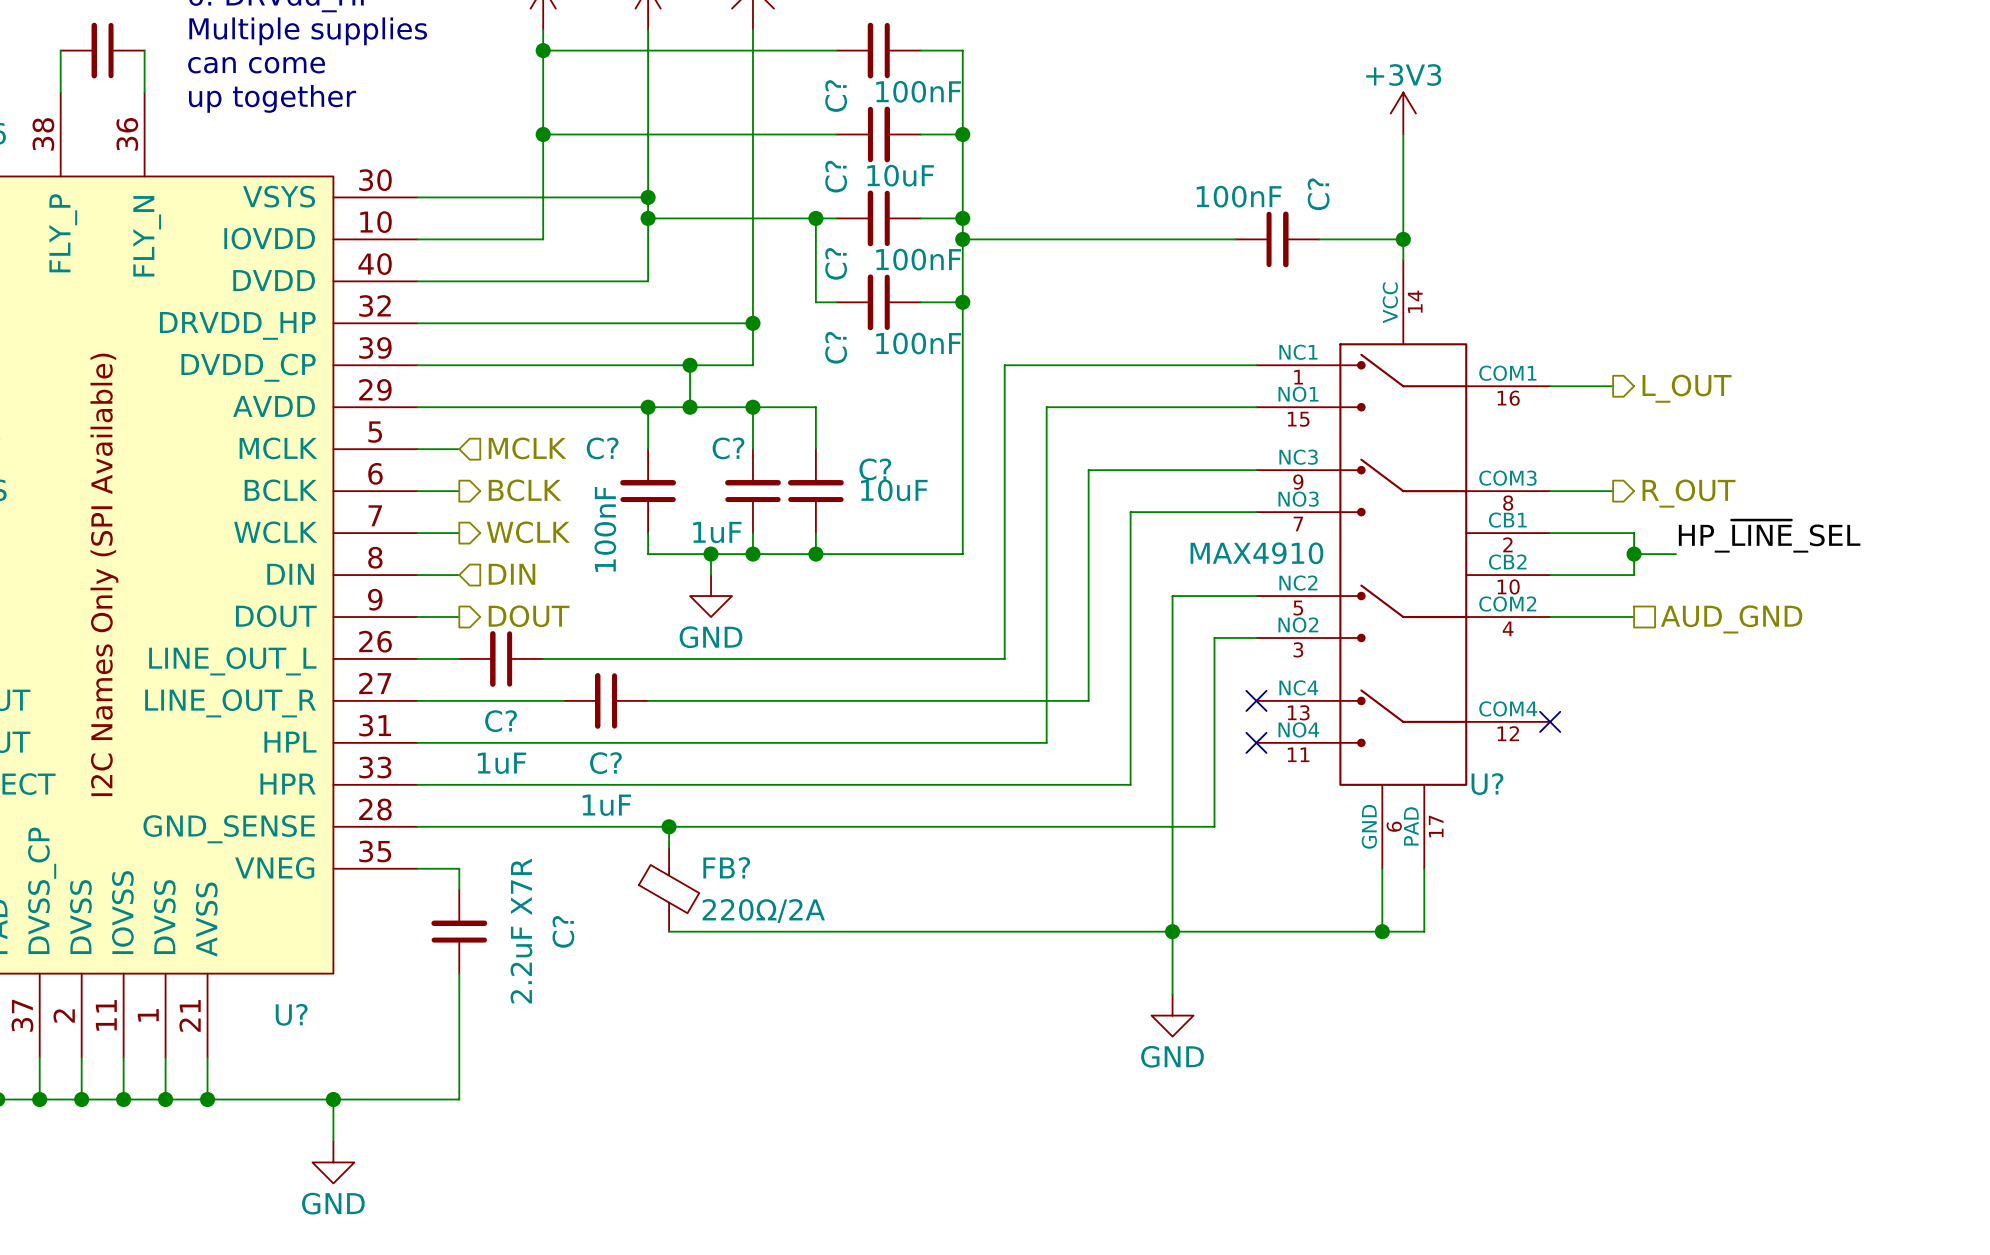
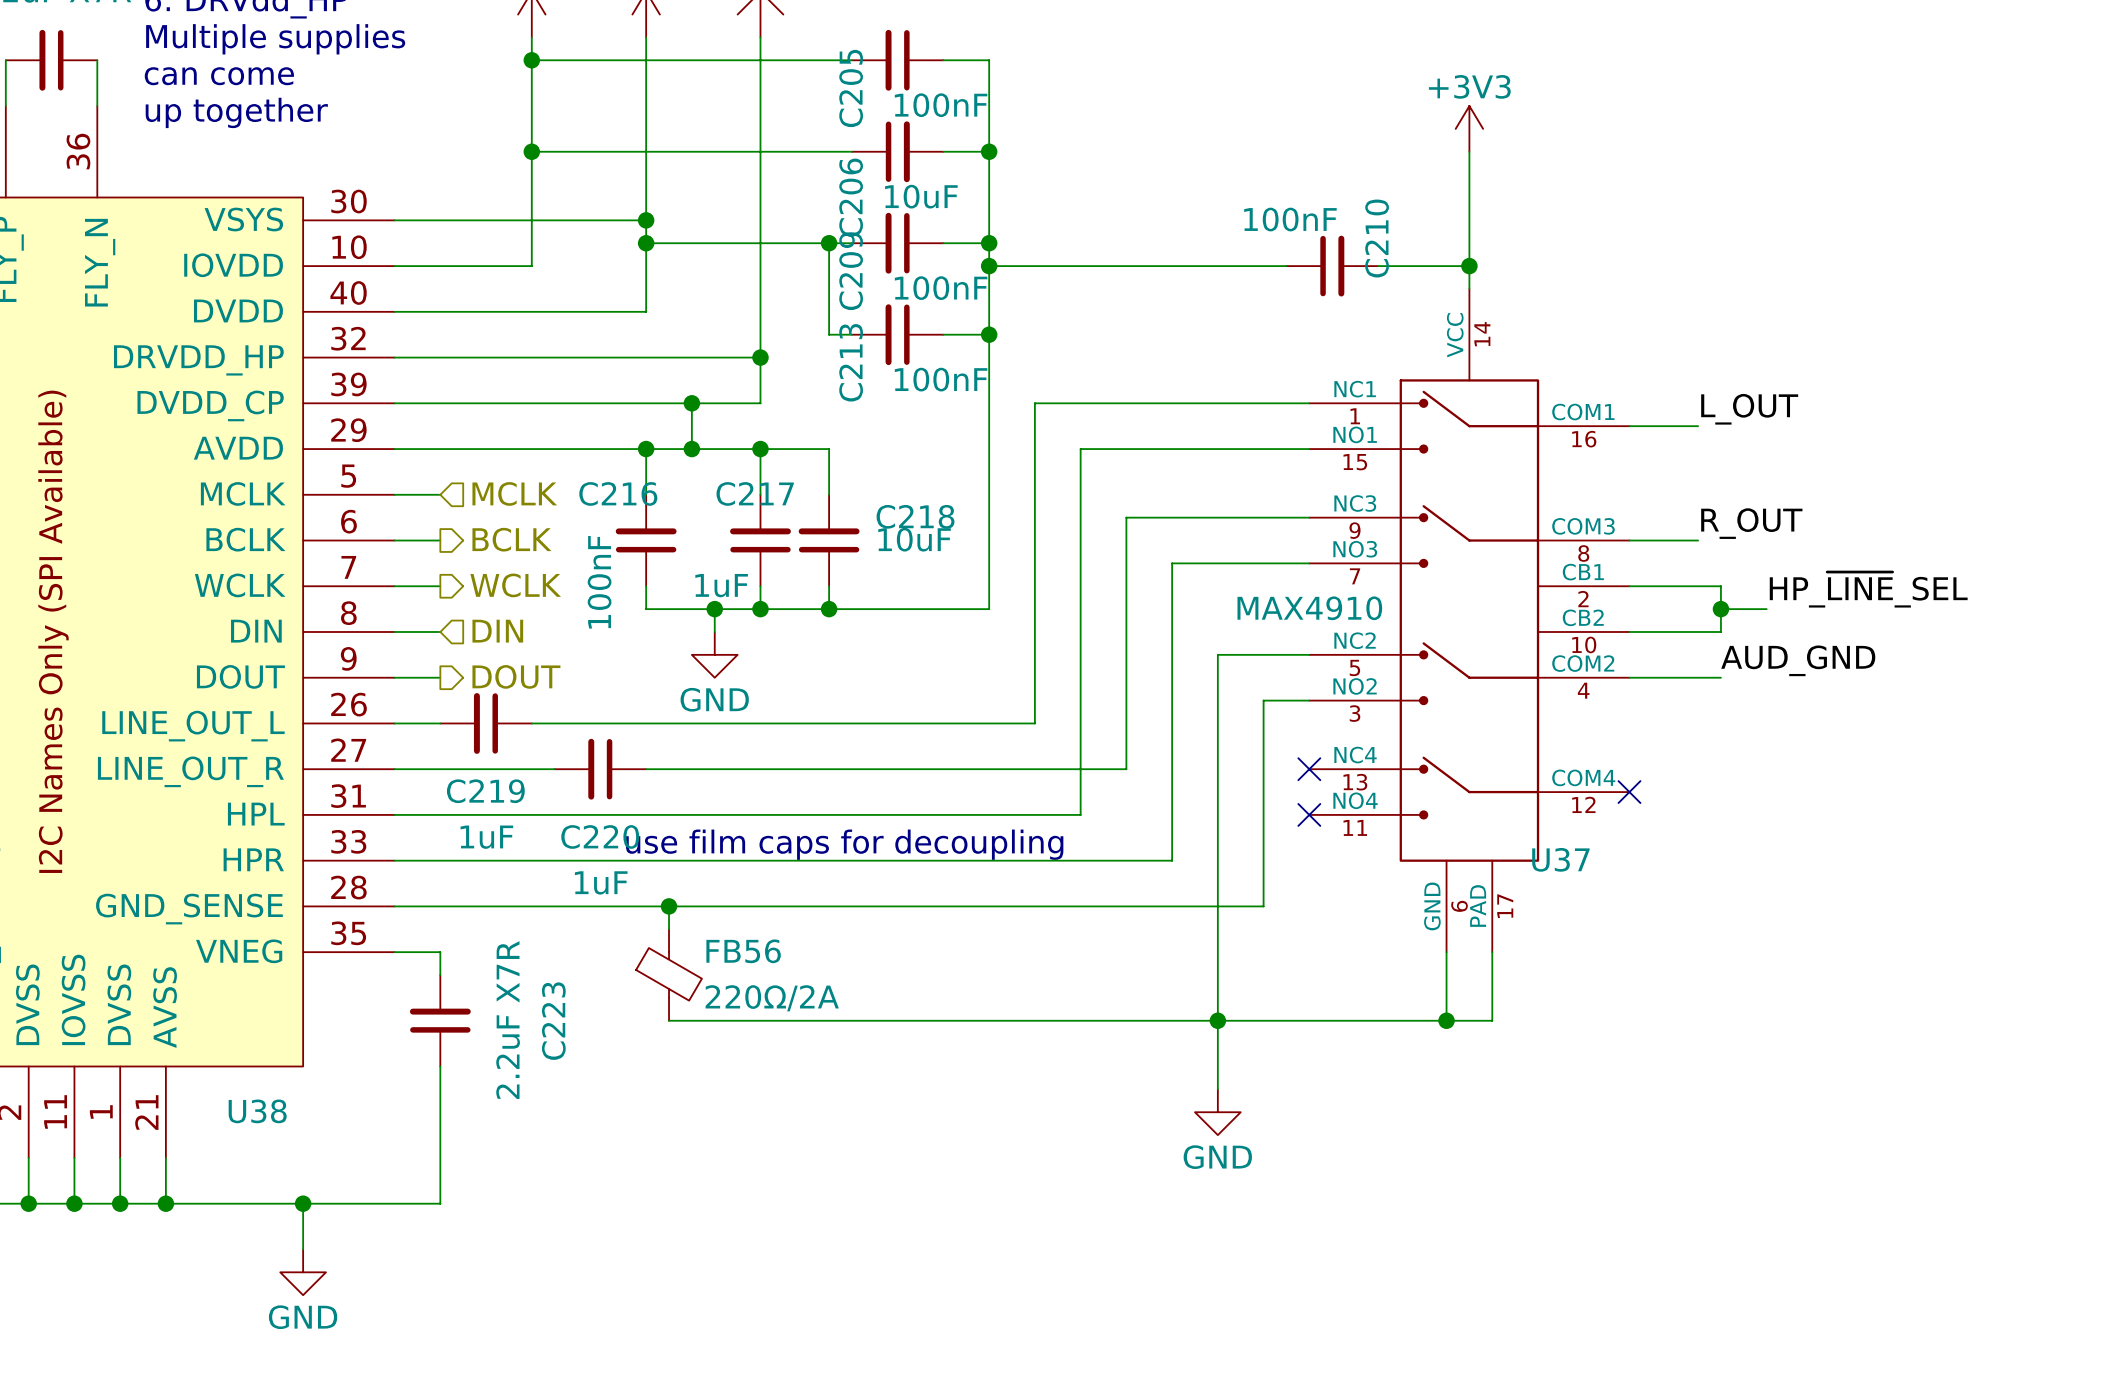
C? name: C? (836, 96) -> C205 (851, 88)
C? name: C? (836, 176) -> C206 (851, 197)
C? name: C? (1318, 194) -> C210 (1377, 238)
C? name: C? (836, 263) -> C209 (851, 271)
C? name: C? (836, 347) -> C213 (851, 362)
label: none -> L_OUT (1749, 409)
hierarchical label: L_OUT (1687, 388) -> none
C? name: C? (602, 448) -> C216 (618, 493)
C? name: C? (728, 448) -> C217 (755, 493)
C? name: C? (875, 469) -> C218 (915, 516)
label: none -> R_OUT (1751, 523)
hierarchical label: R_OUT (1689, 493) -> none
label: none -> AUD_GND (1798, 660)
hierarchical label: AUD_GND (1731, 619) -> none
C? name: C? (501, 721) -> C219 (485, 791)
C? name: C? (605, 763) -> C220 (600, 836)
text: none -> use film caps for decoupling (844, 844)
U? name: U? (1487, 784) -> U37 (1560, 859)
FB? name: FB? (726, 867) -> FB56 (743, 951)
C? name: C? (563, 931) -> C223 (553, 1021)
U? name: U? (291, 1014) -> U38 (257, 1111)

